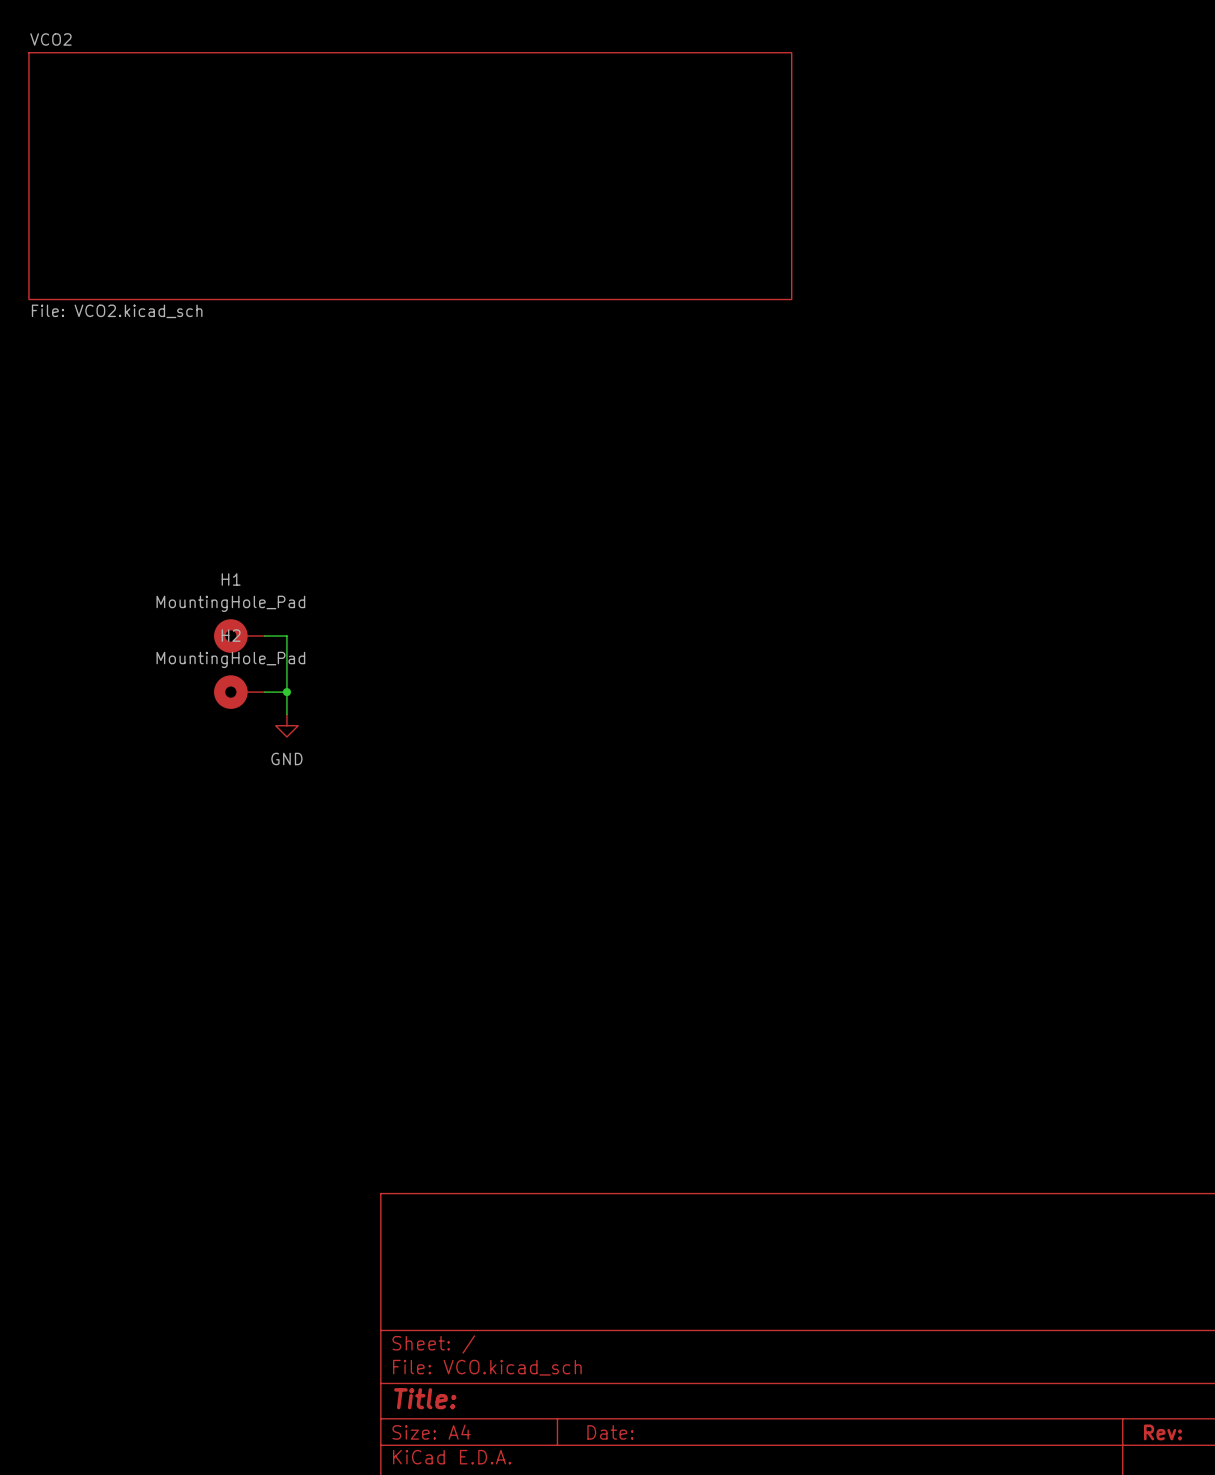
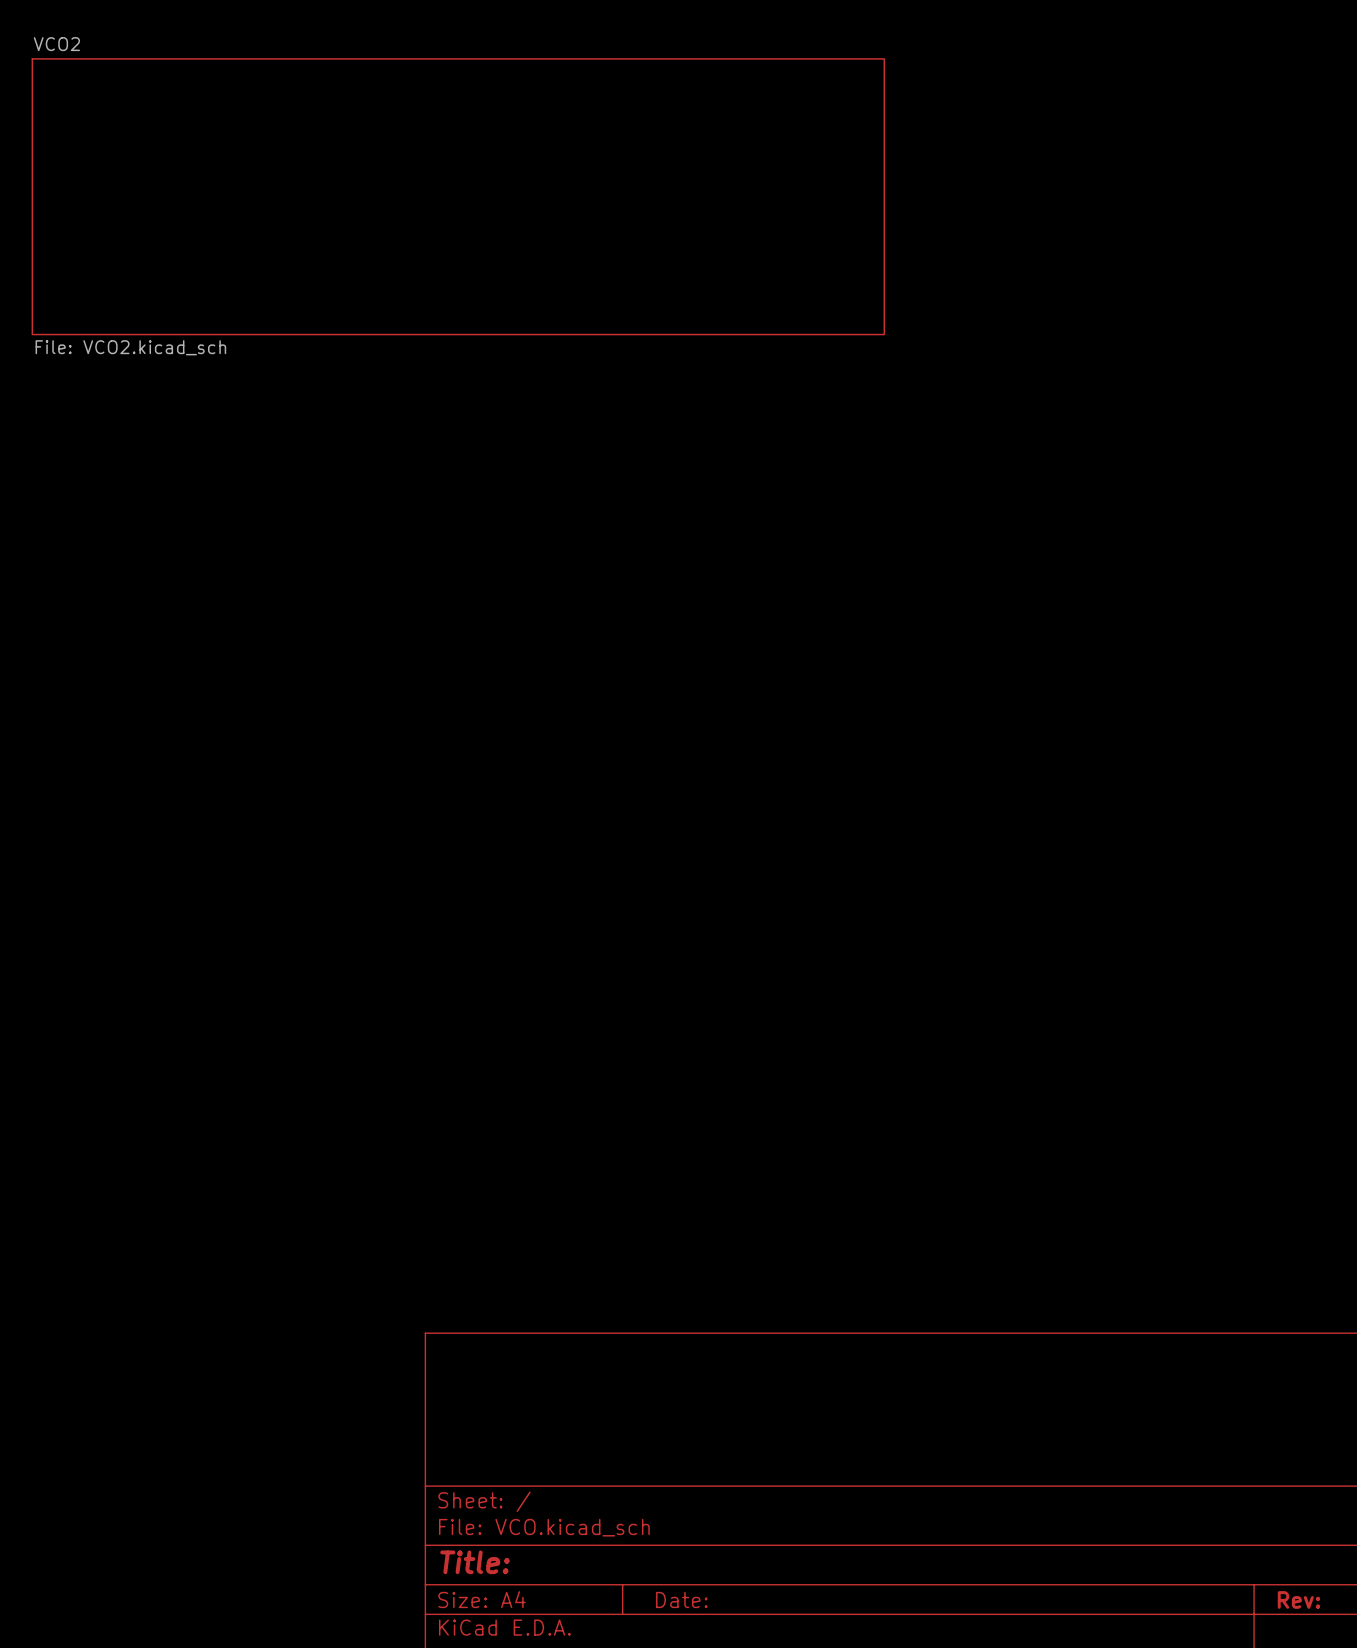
H1: MountingHole_Pad (239, 636) -> none
wire: (264, 636) (286, 636) (286, 714) -> none
H2: MountingHole_Pad (239, 692) -> none
wire: (264, 692) (286, 692) -> none
junction: (286, 692) -> none
power symbol: GND (286, 725) -> none

